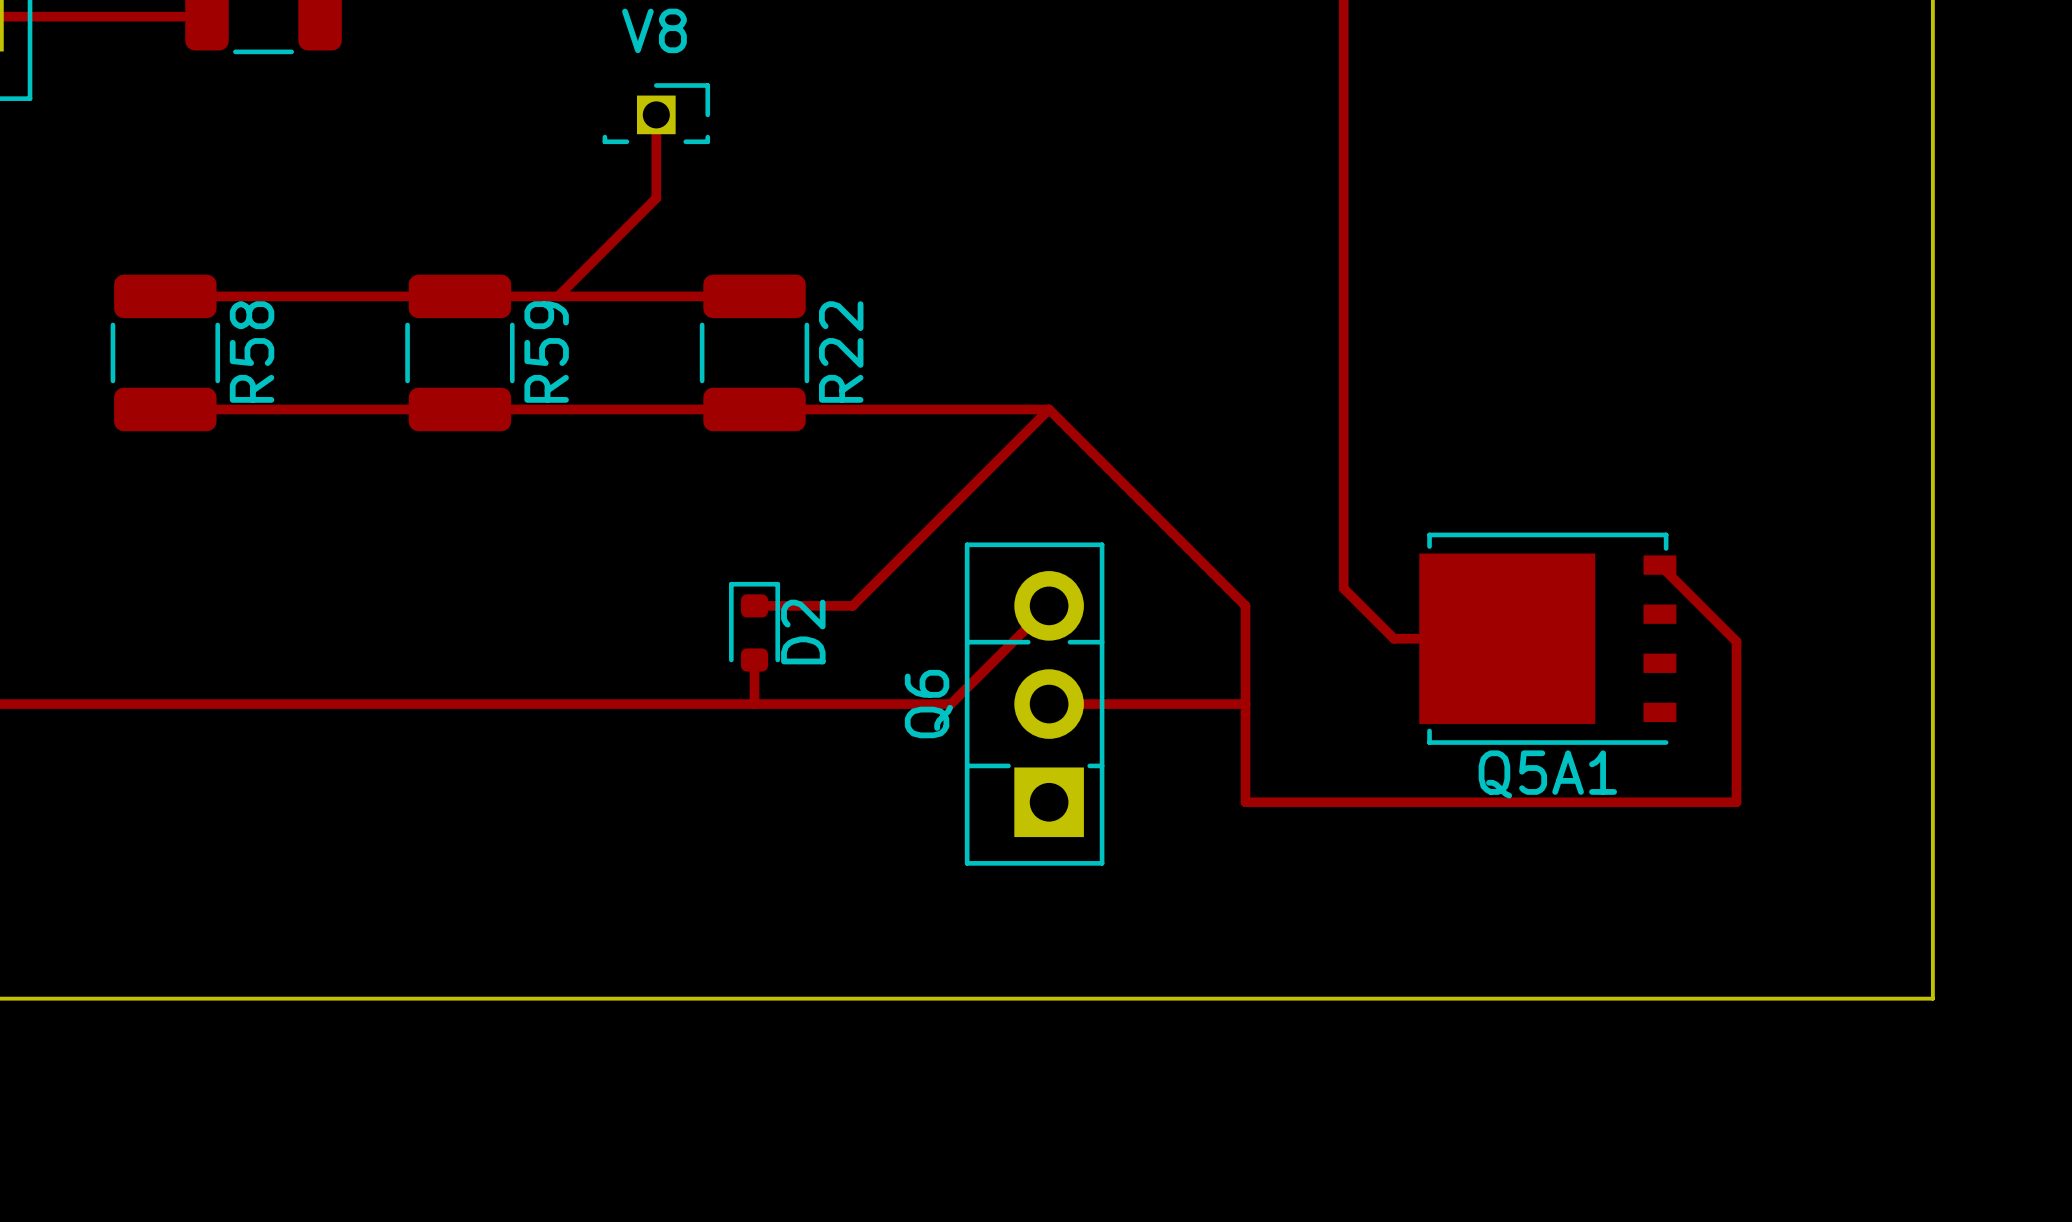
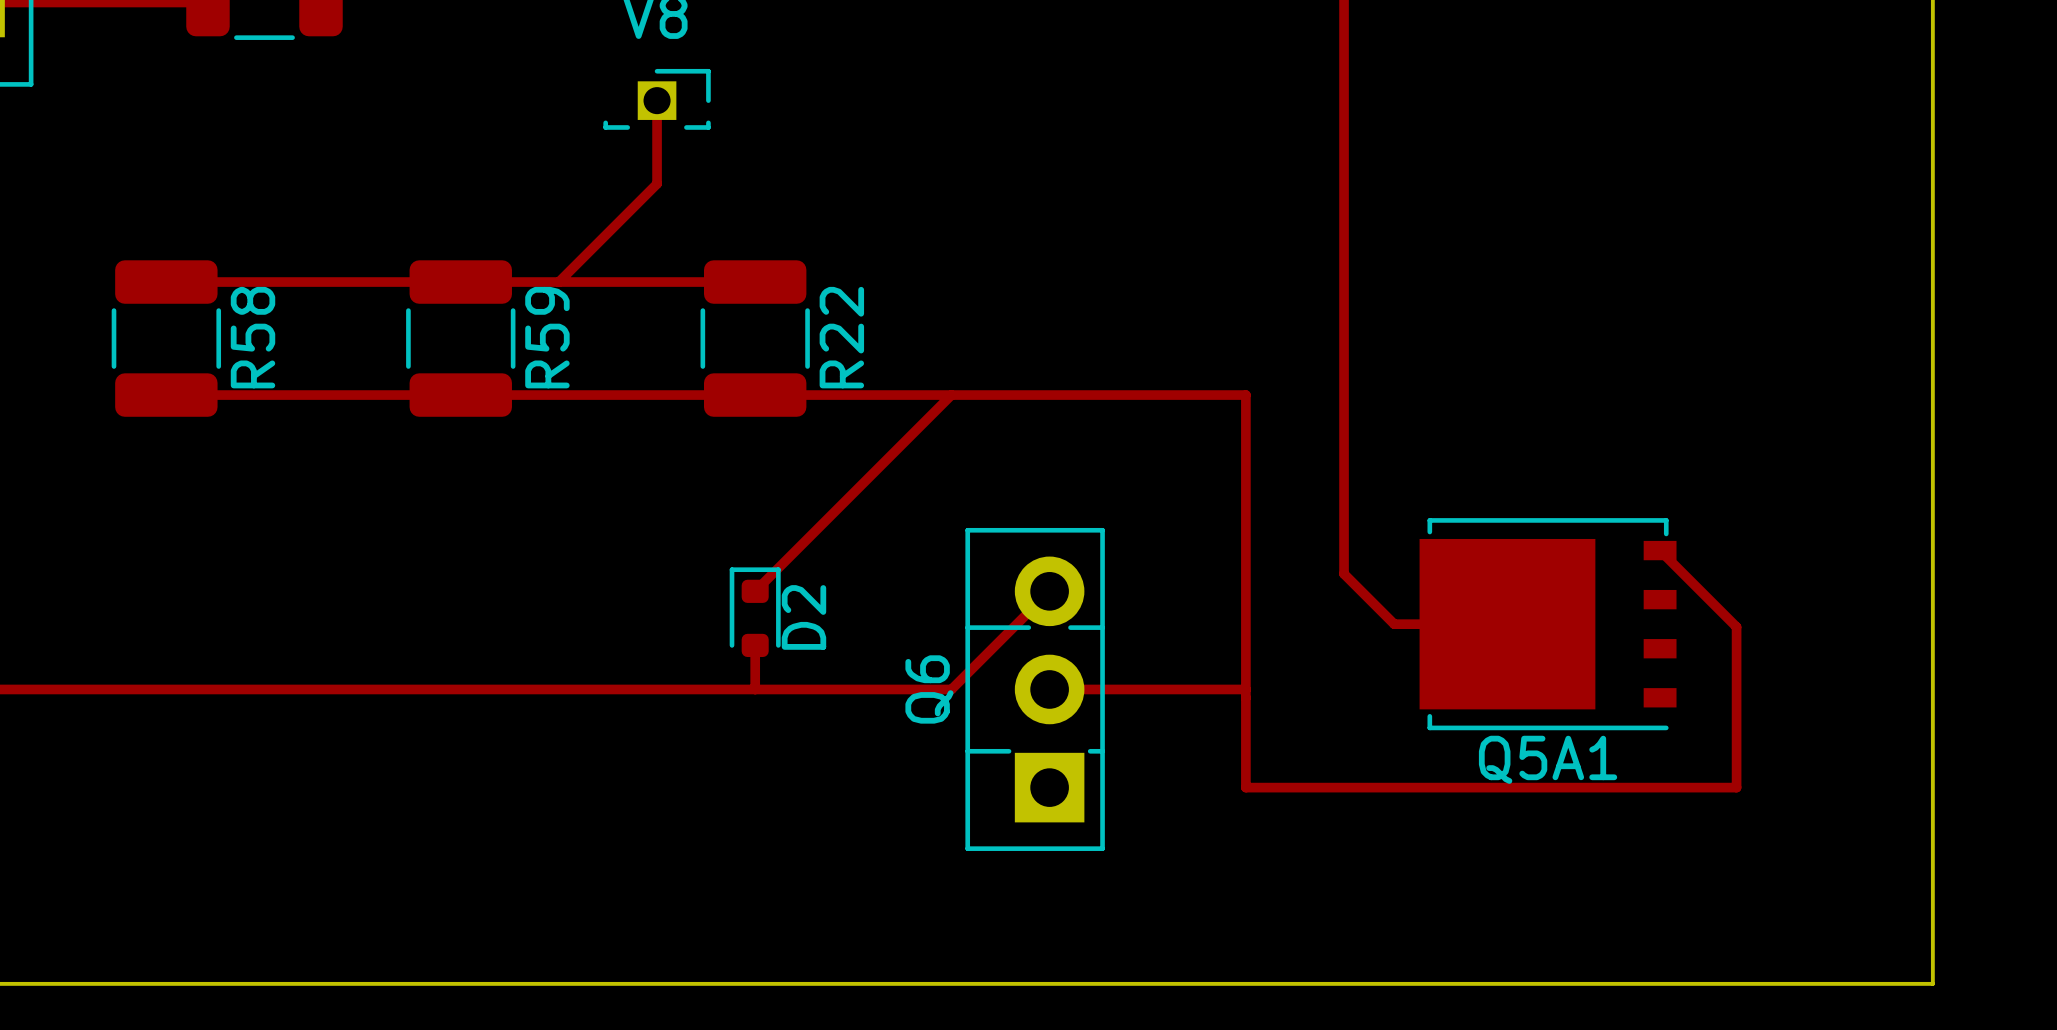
track: none -> (951, 395) (755, 591)
track: (754, 605) (852, 605) (1049, 409) (1245, 605) -> (1049, 395) (1245, 395) (1245, 591)

